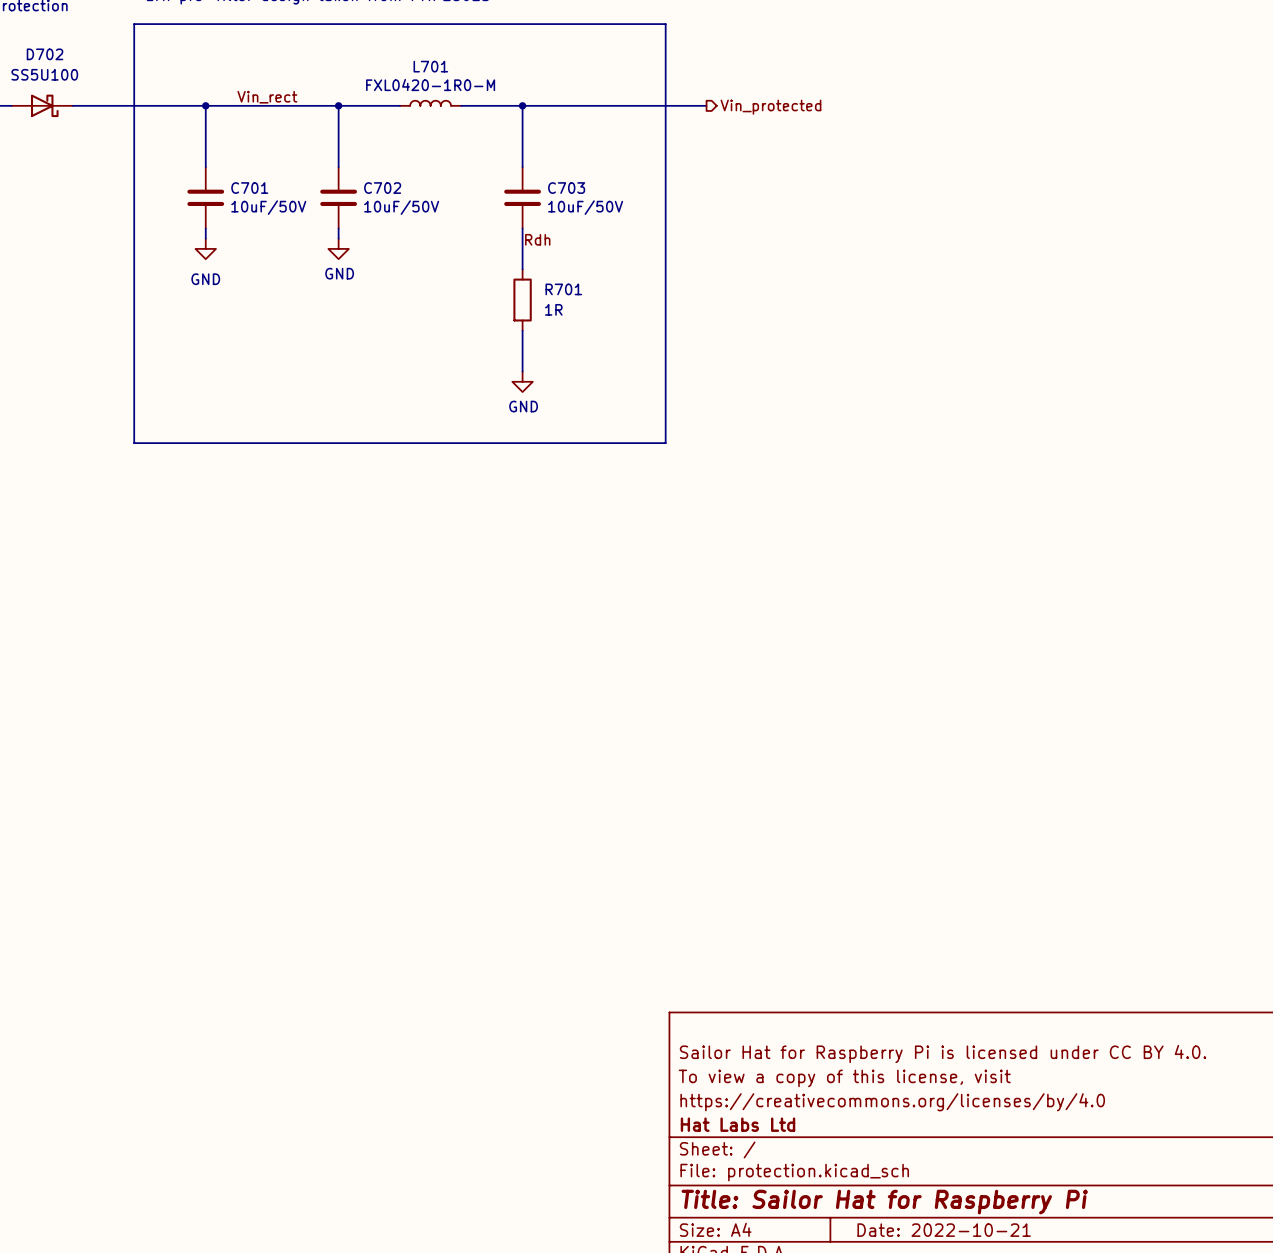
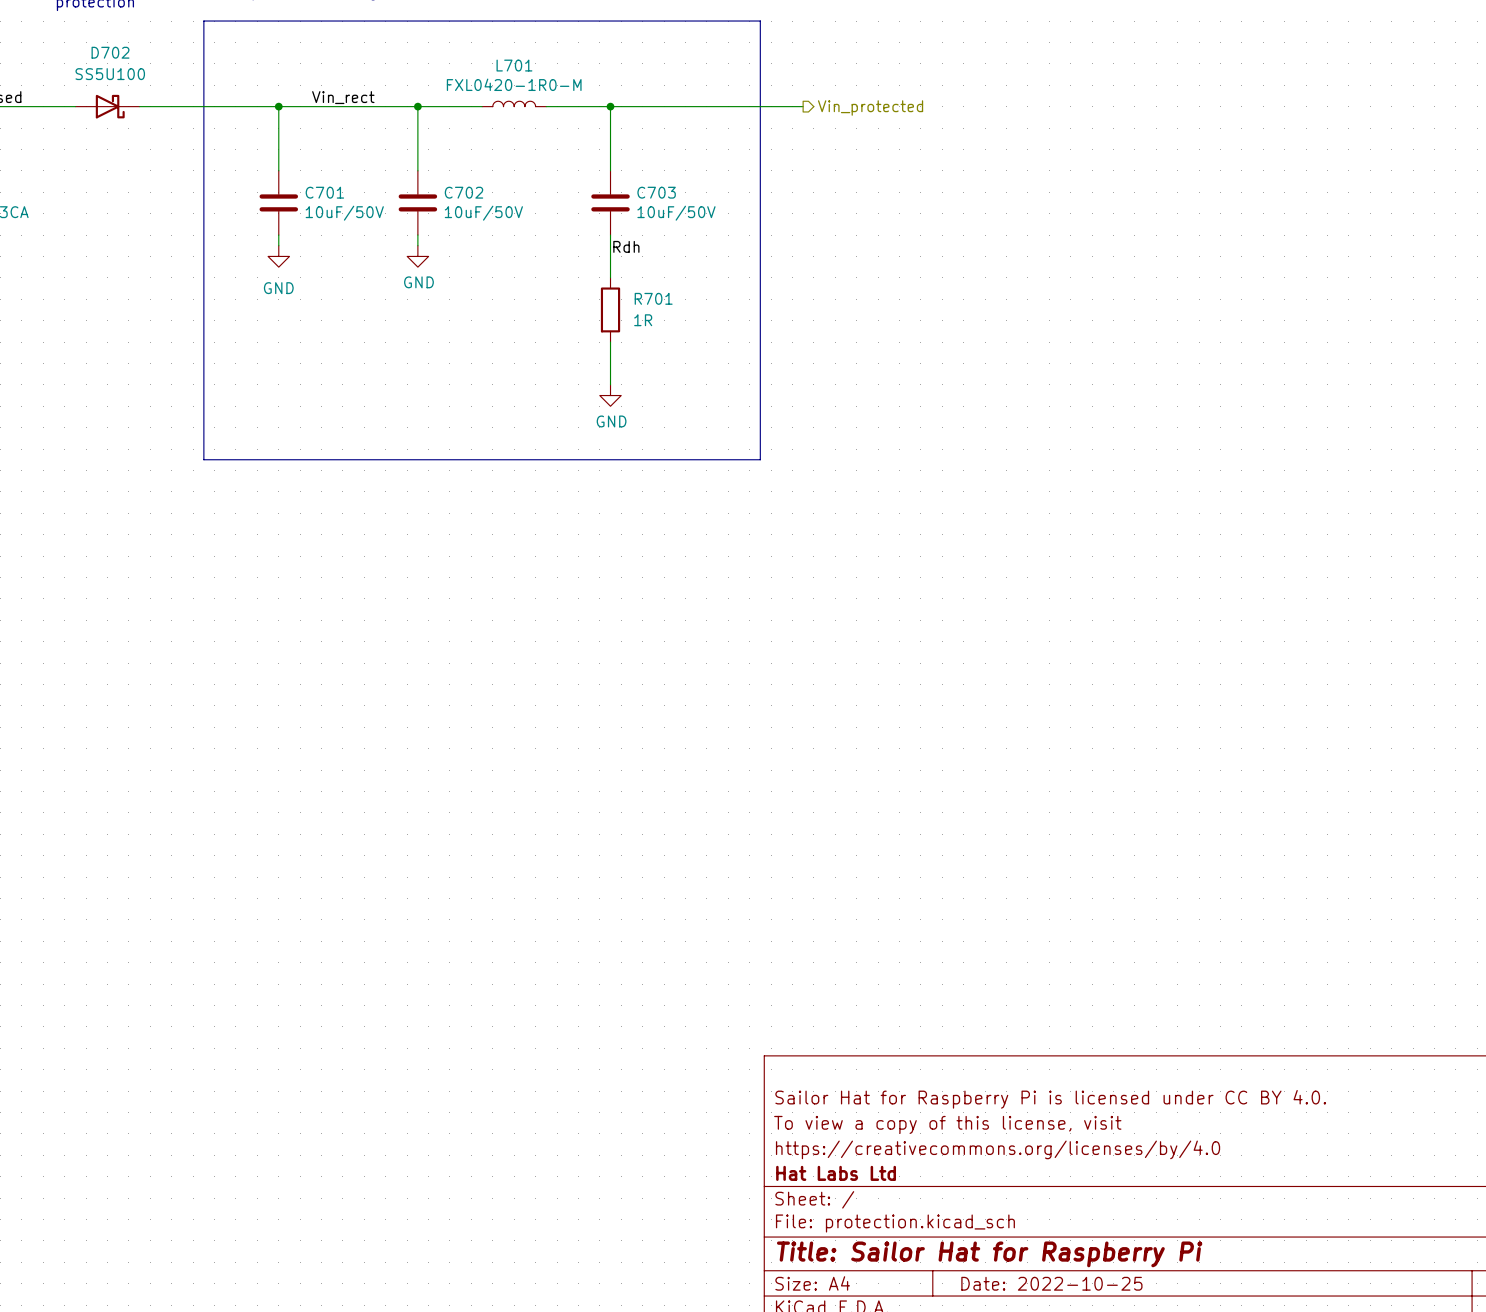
title block: Date: 2022-10-21 (944, 1230) -> Date: 2022-10-25 (1051, 1283)

